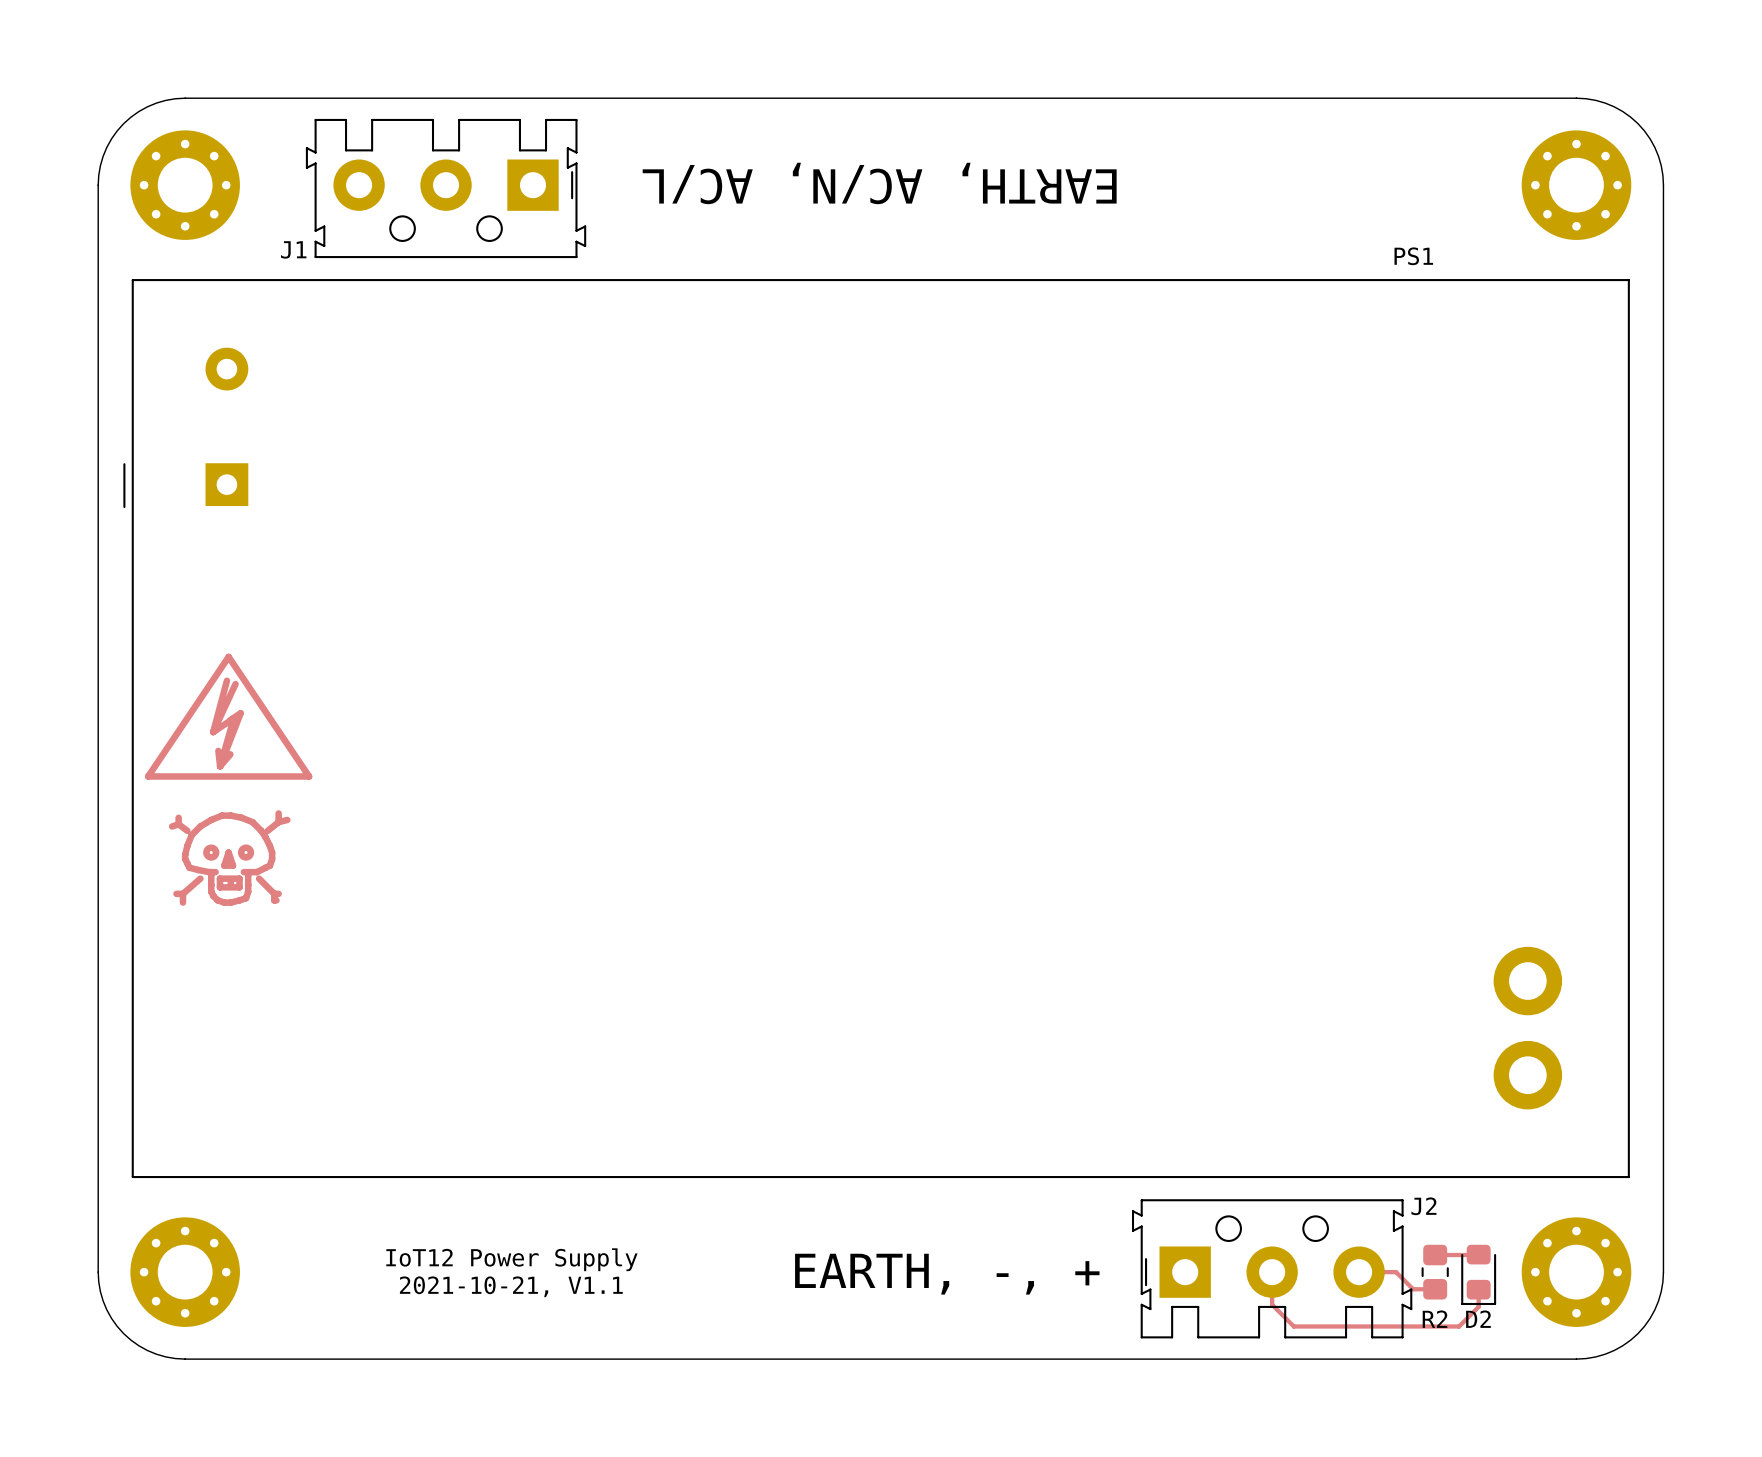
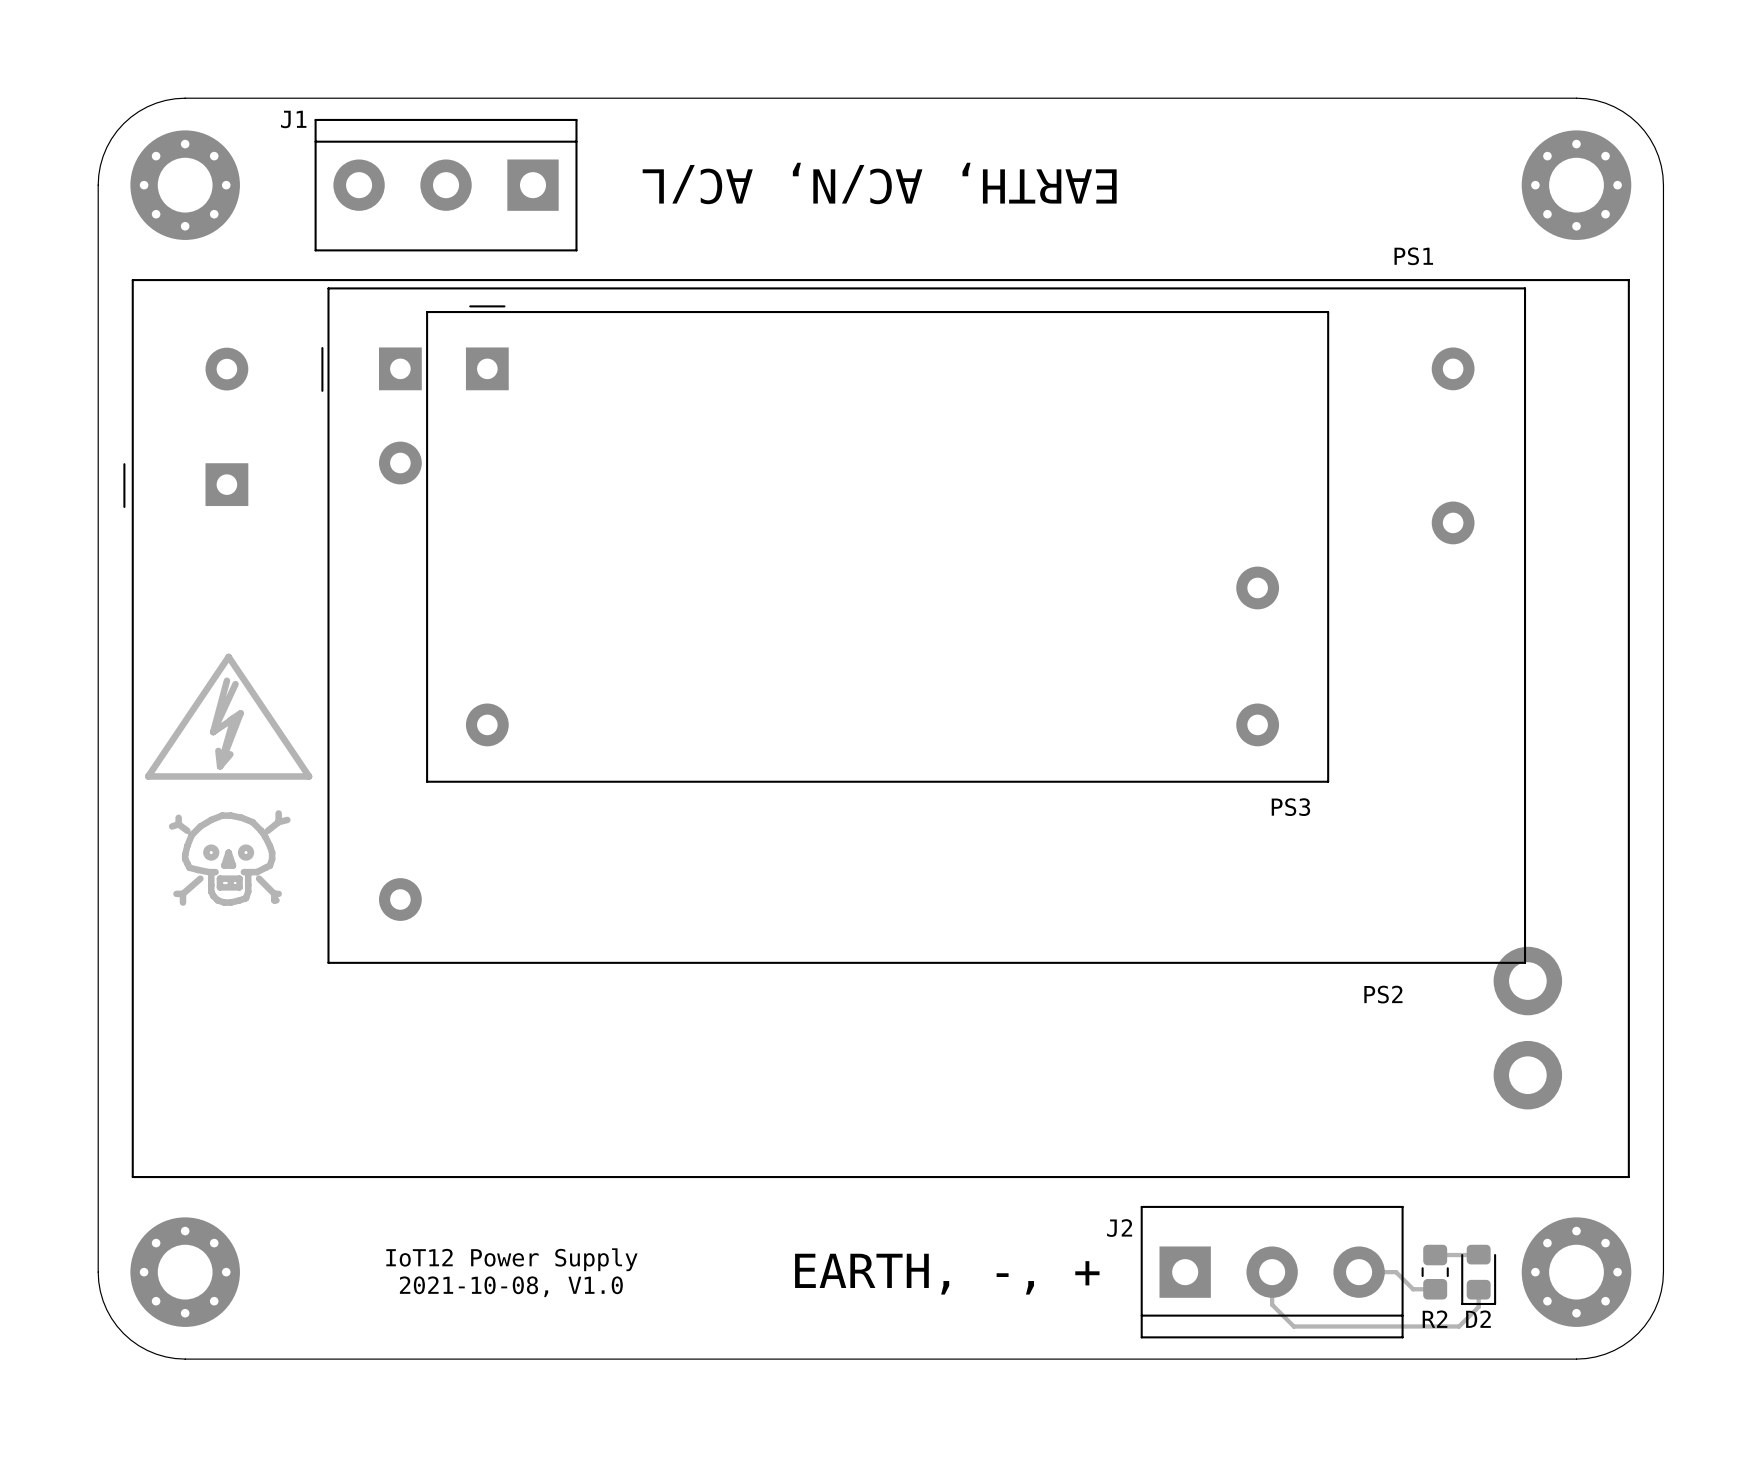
J1 footprint: [305, 118, 587, 259] -> [314, 118, 578, 252]
J1 name position: J1 (293, 249) -> J1 (293, 119)
PS3: none -> (877, 544)
PS2: none -> (923, 625)
J2 footprint: [1131, 1199, 1413, 1339] -> [1140, 1205, 1404, 1339]
J2 name position: J2 (1423, 1206) -> J2 (1119, 1228)
text: 2021-10-21, V1.1 (511, 1286) -> 2021-10-08, V1.0 (511, 1286)

